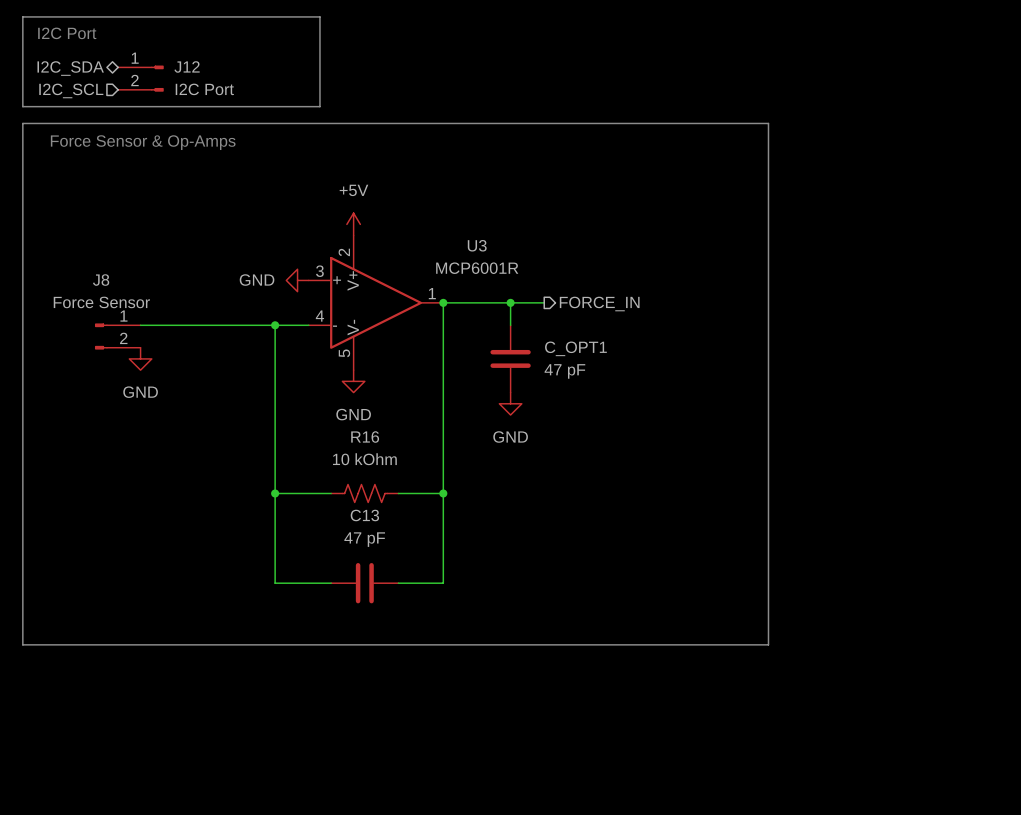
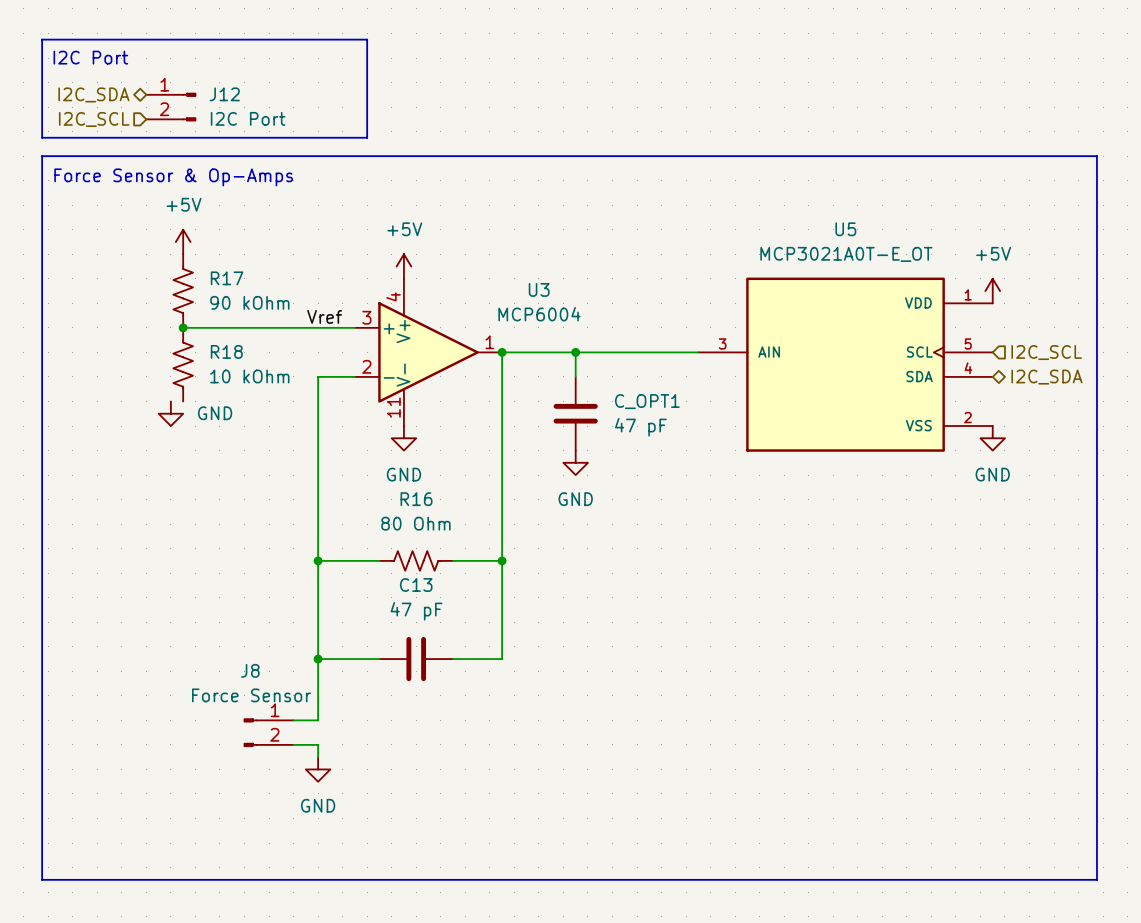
line: (768, 123) (768, 644) (22, 644) -> (857, 156) (1096, 156) (1096, 879) (42, 879) (42, 726)
power symbol: none -> +5V (183, 242)
R17: none -> 90 kOhm (183, 291)
power symbol: none -> +5V (992, 291)
U3 pin number: 2 (344, 252) -> 4 (393, 296)
U3 value: MCP6001R (477, 268) -> MCP6004 (539, 314)
label: none -> Vref (324, 316)
wire: none -> (183, 327) (354, 327)
junction: none -> (183, 327)
power symbol: GND (297, 280) -> none
wire: none -> (612, 352) (698, 352)
hierarchical label: FORCE_IN (599, 303) -> none
hierarchical label: none -> I2C_SCL (1046, 352)
R18: none -> 10 kOhm (183, 364)
U5: none -> MCP3021A0T-E_OT (845, 364)
U3 pin number: 4 (319, 316) -> 2 (366, 366)
wire: (140, 325) (275, 325) -> none
junction: (275, 325) -> none
hierarchical label: none -> I2C_SDA (1046, 377)
J8 position: (117, 336) -> (268, 732)
U3 pin number: 5 (344, 353) -> 11 (393, 407)
power symbol: none -> GND (992, 438)
power symbol text position: GND (140, 392) -> GND (215, 413)
R16 value: 10 kOhm (364, 459) -> 80 Ohm (415, 523)
wire: none -> (318, 659) (318, 720) (293, 720)
junction: none -> (318, 659)
wire: none -> (293, 744) (318, 744) (318, 757)
power symbol: none -> GND (318, 769)

